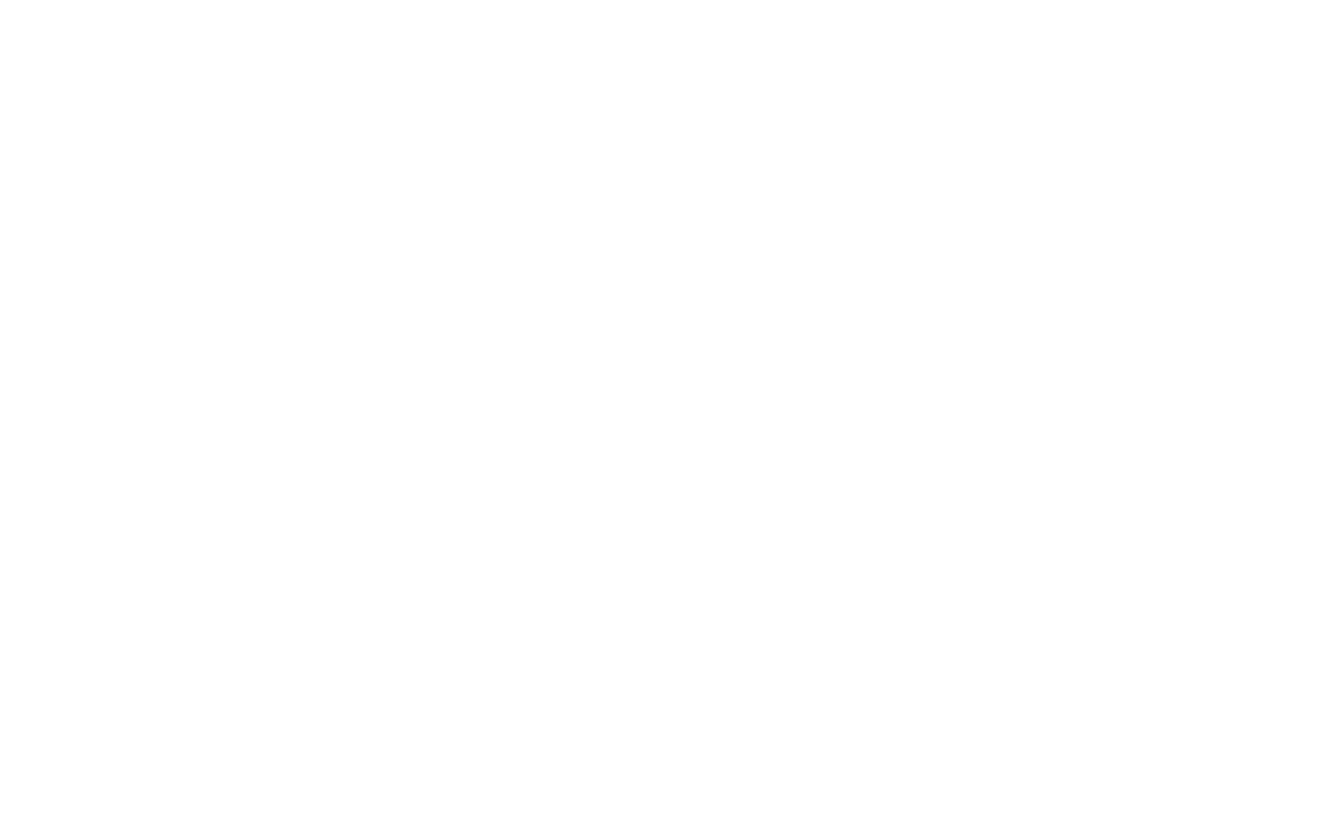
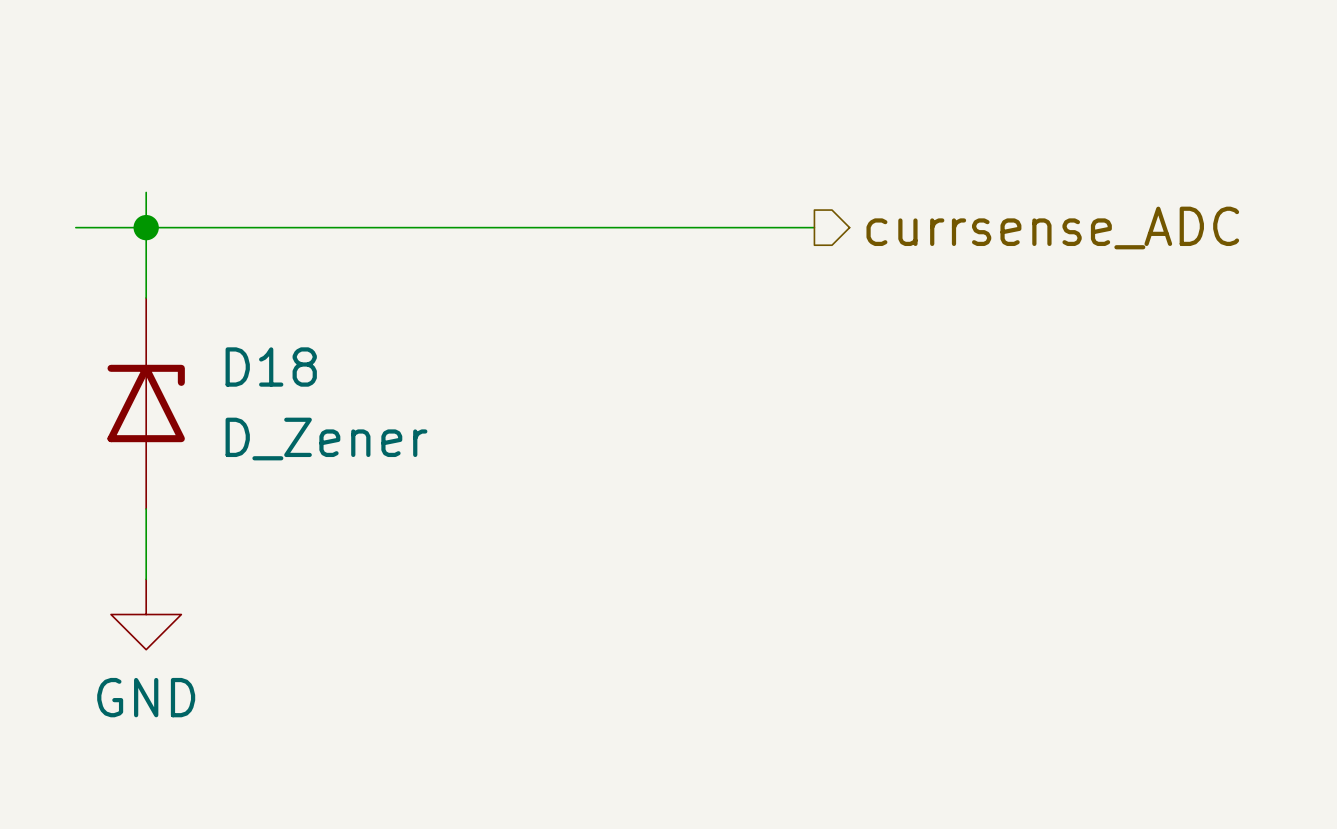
wire: none -> (146, 192) (146, 297)
wire: none -> (75, 227) (814, 227)
junction: none -> (146, 227)
hierarchical label: none -> currsense_ADC (1052, 227)
D18: none -> D_Zener (146, 403)
wire: none -> (146, 509) (146, 579)
power symbol: none -> GND (146, 614)

